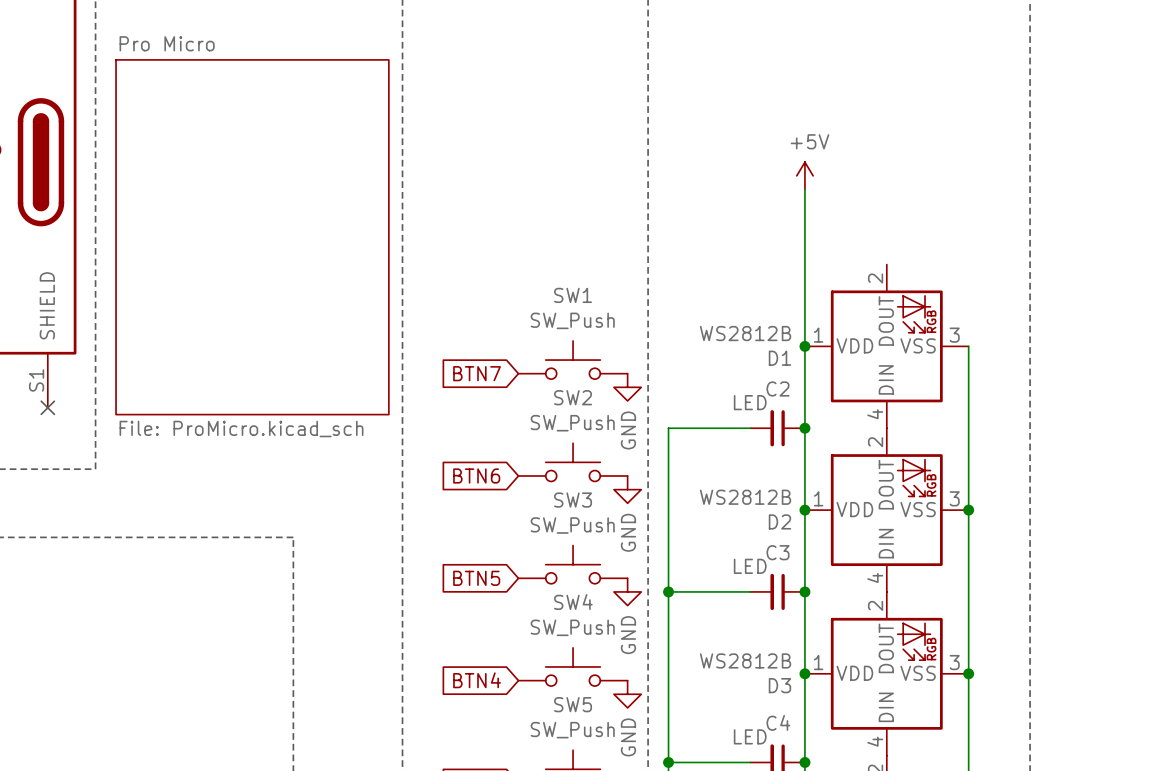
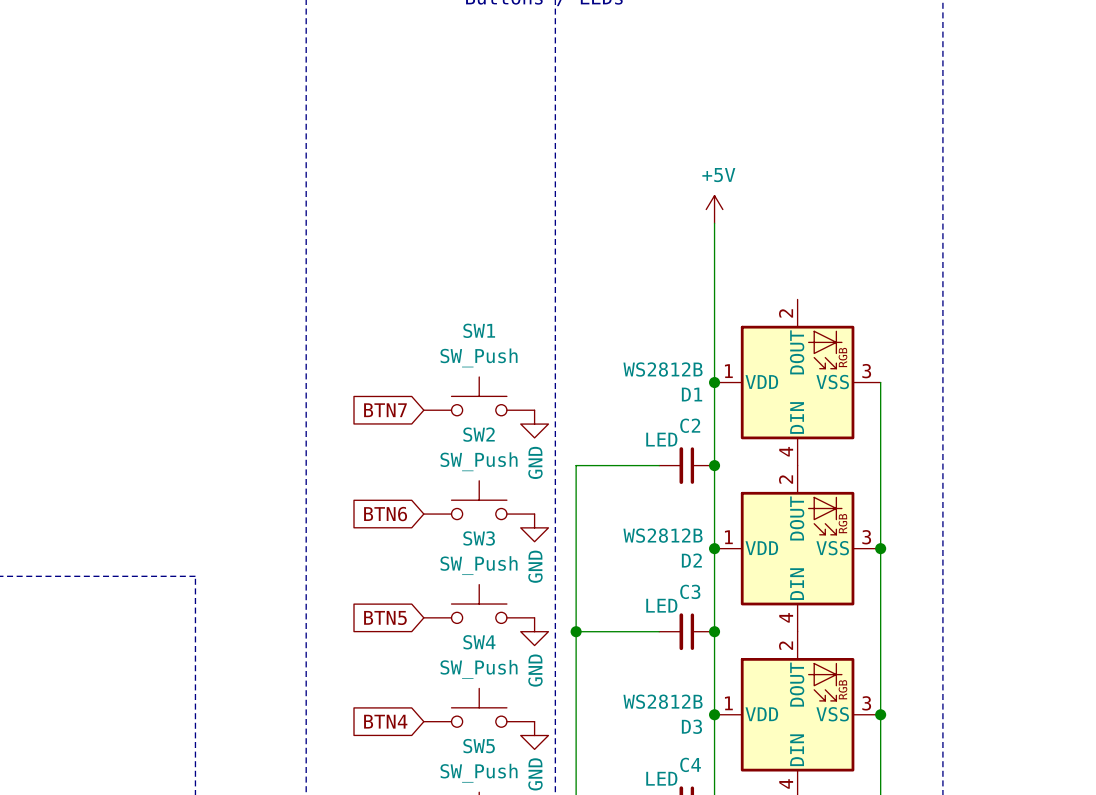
sheet Pro Micro: File: ProMicro.kicad_sch (252, 237) -> none

